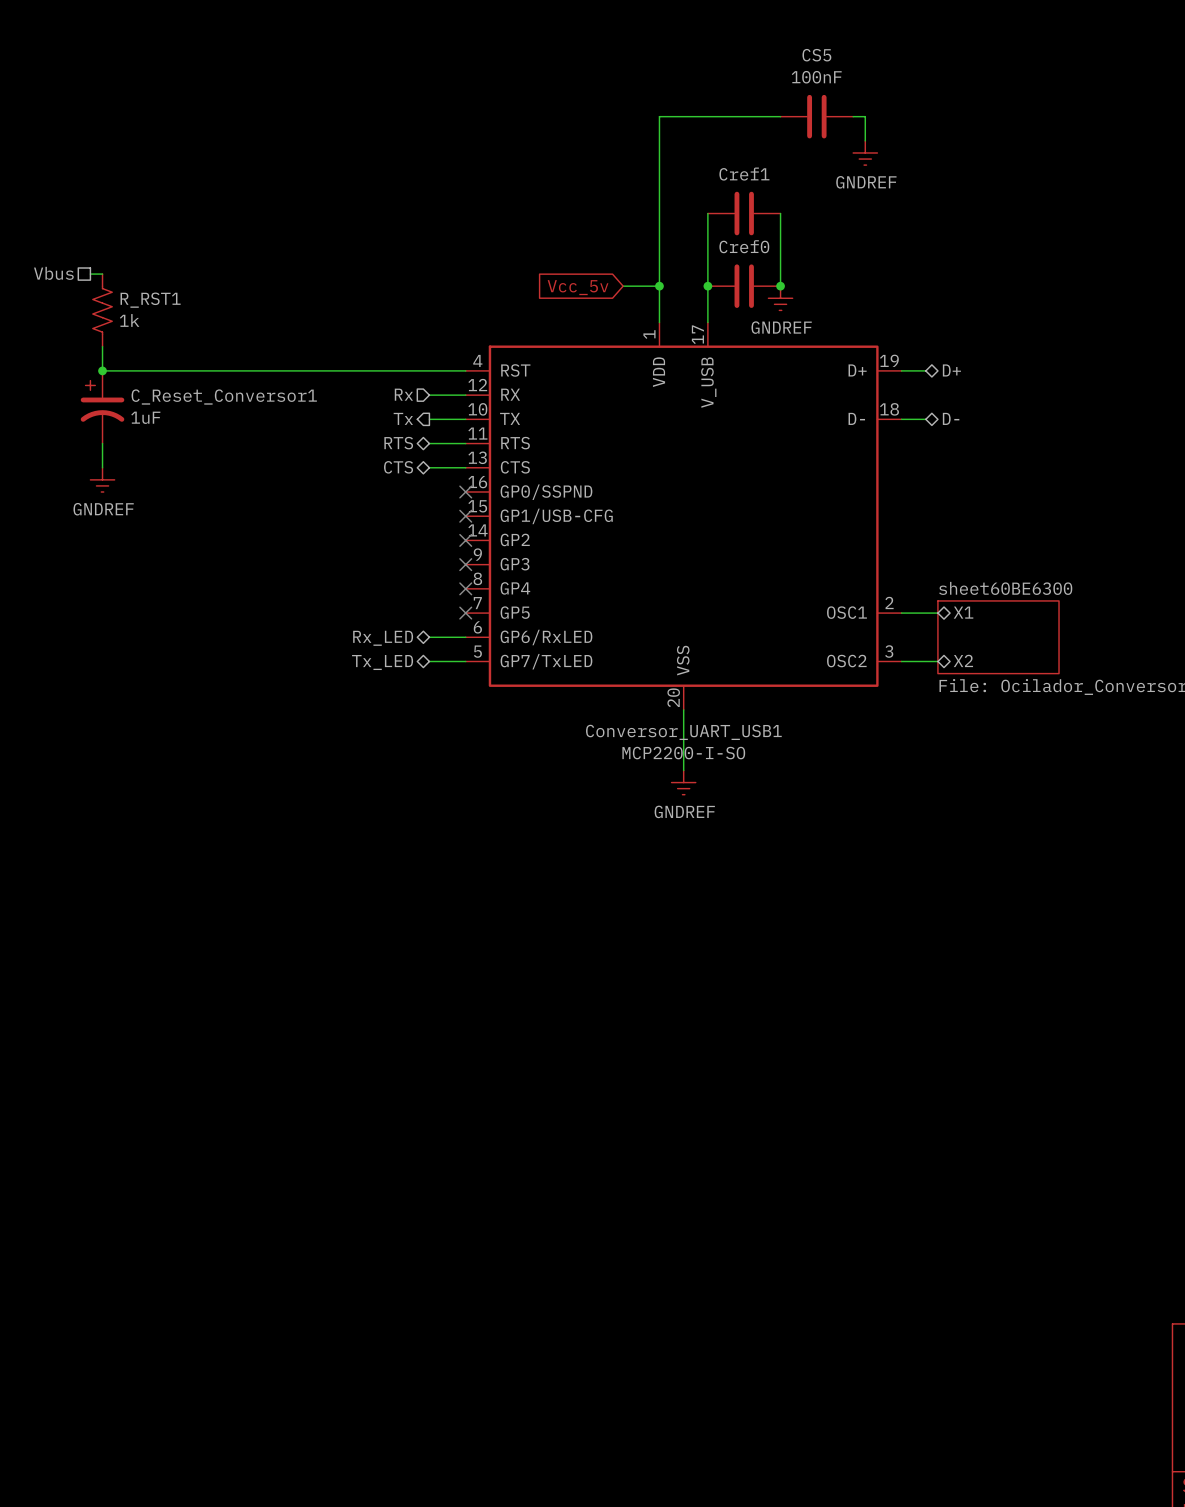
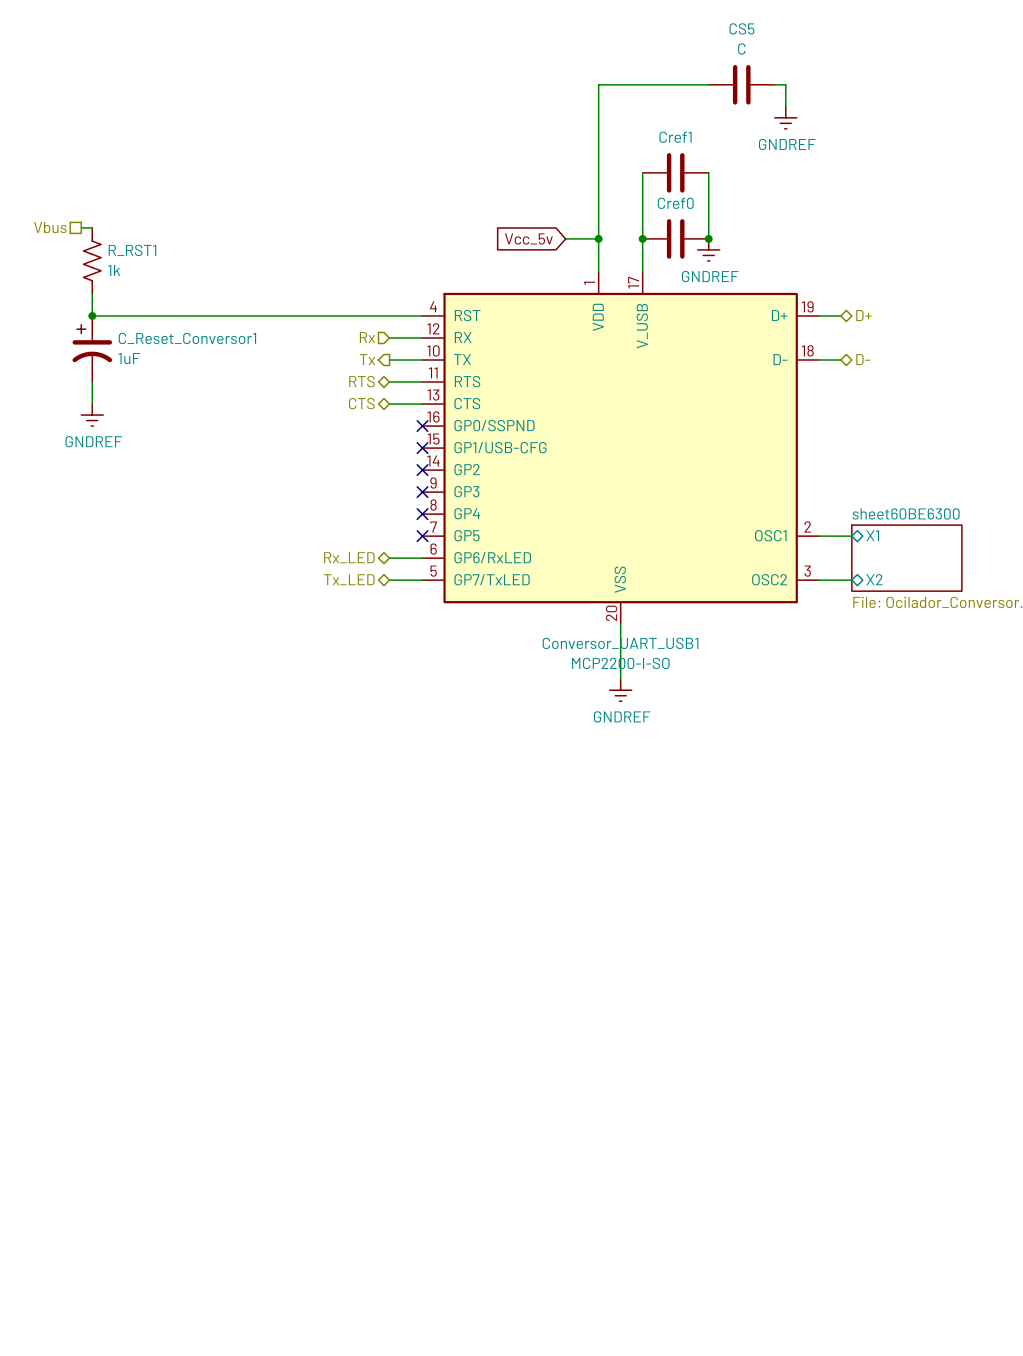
CS5 value: 100nF (816, 77) -> C (741, 48)

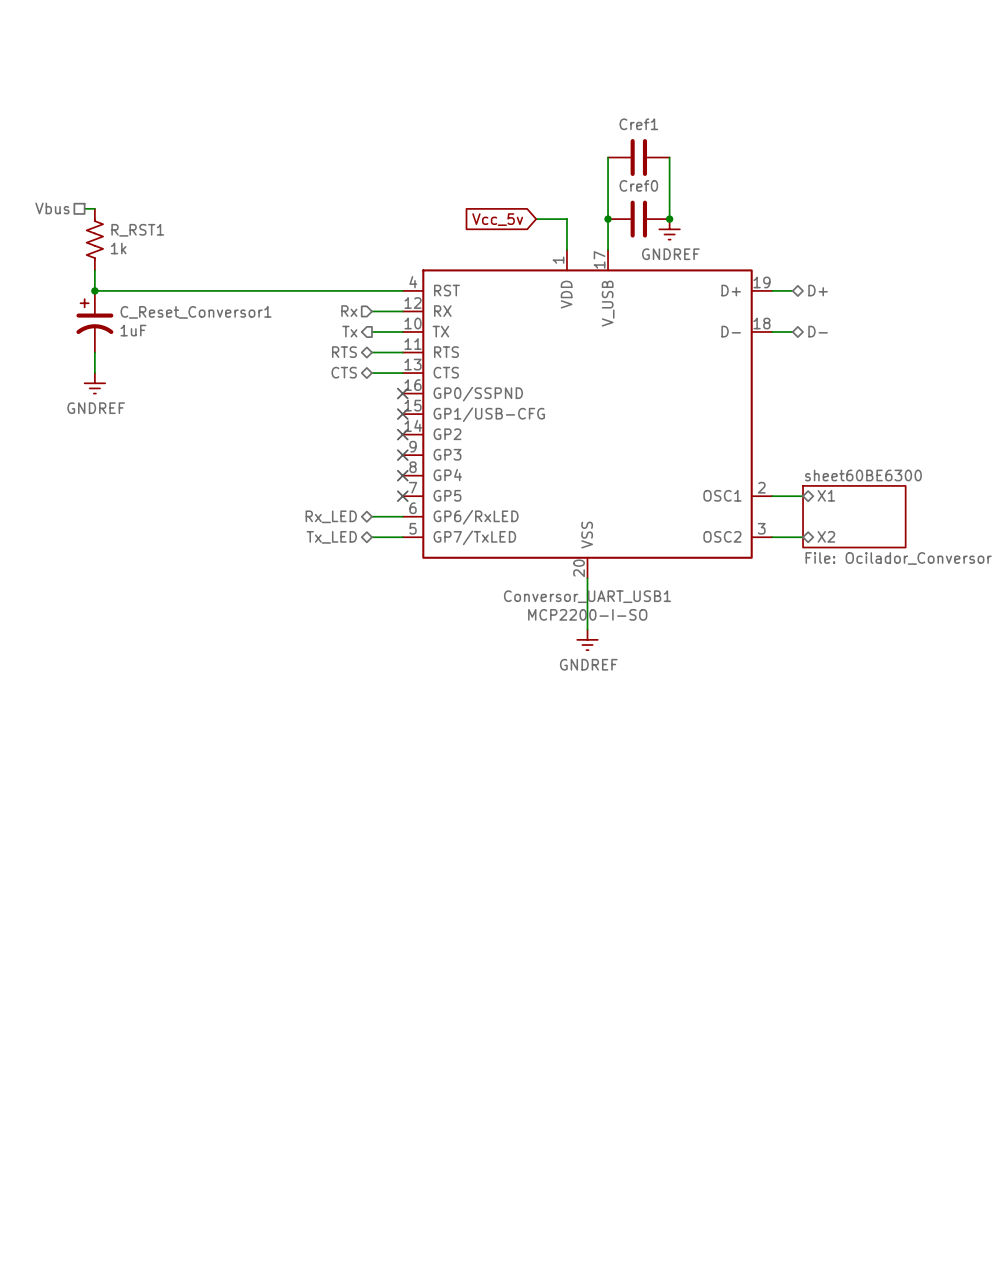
wire: (708, 84) (598, 84) (598, 238) -> none
CS5: C (741, 84) -> none
wire: (774, 84) (785, 84) (785, 106) -> none
power symbol: GNDREF (785, 117) -> none
junction: (598, 238) -> none

